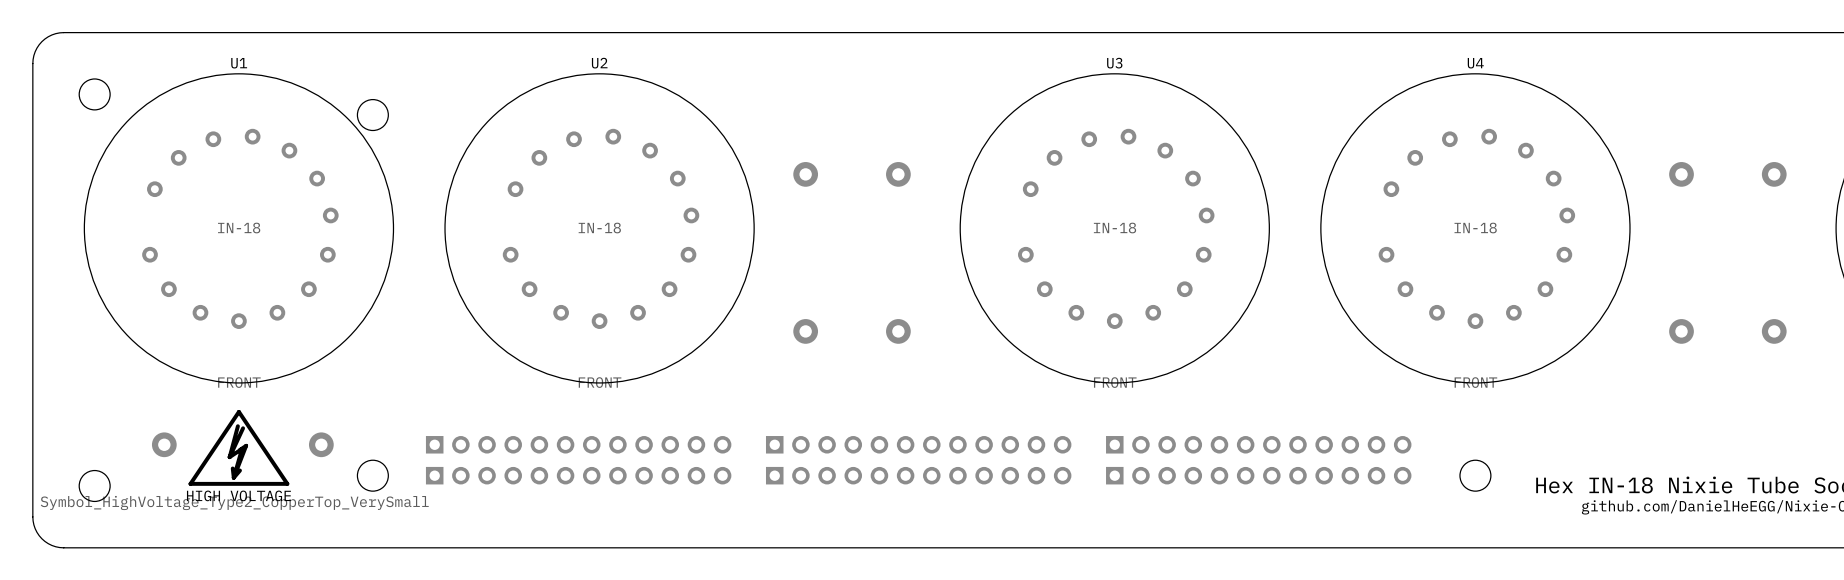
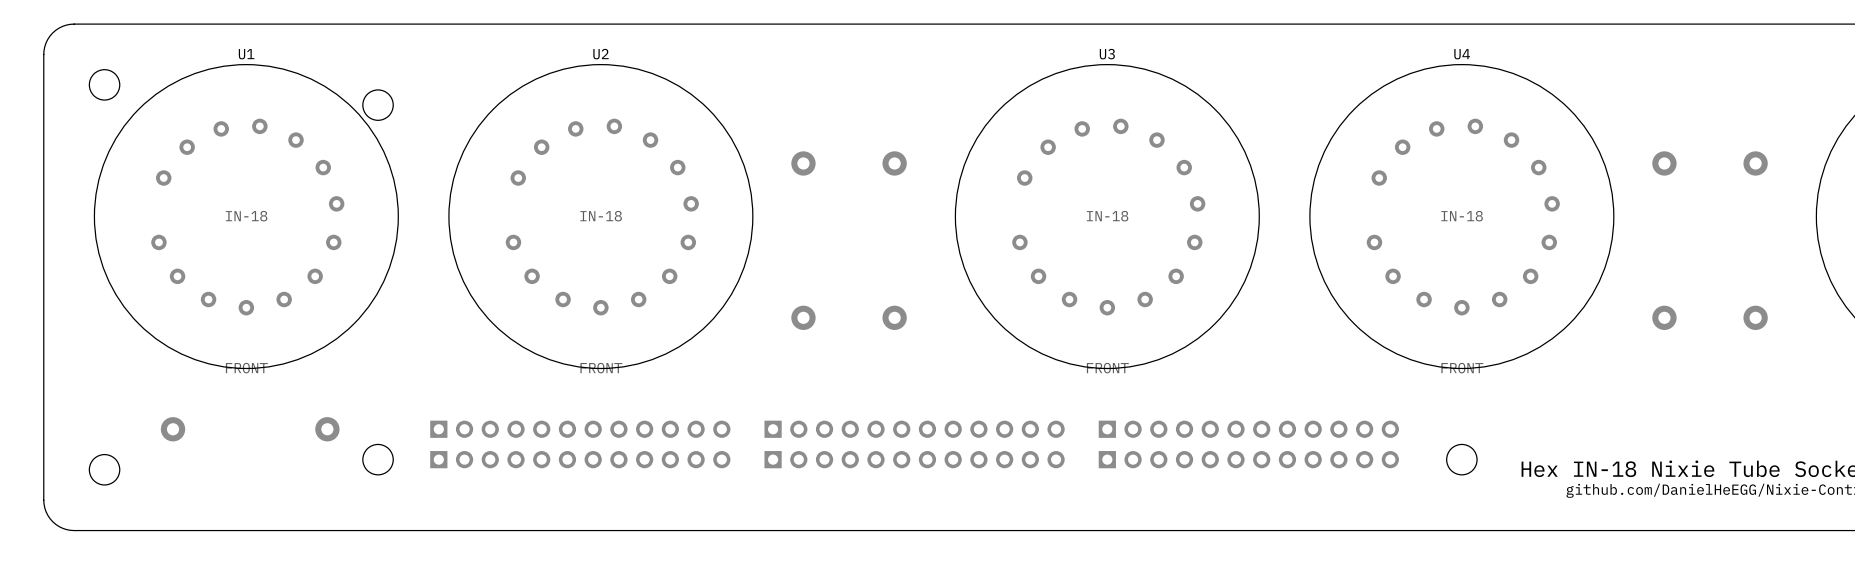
drawing: [188, 409, 290, 486] -> none
text: HIGH VOLTAGE (238, 495) -> none

